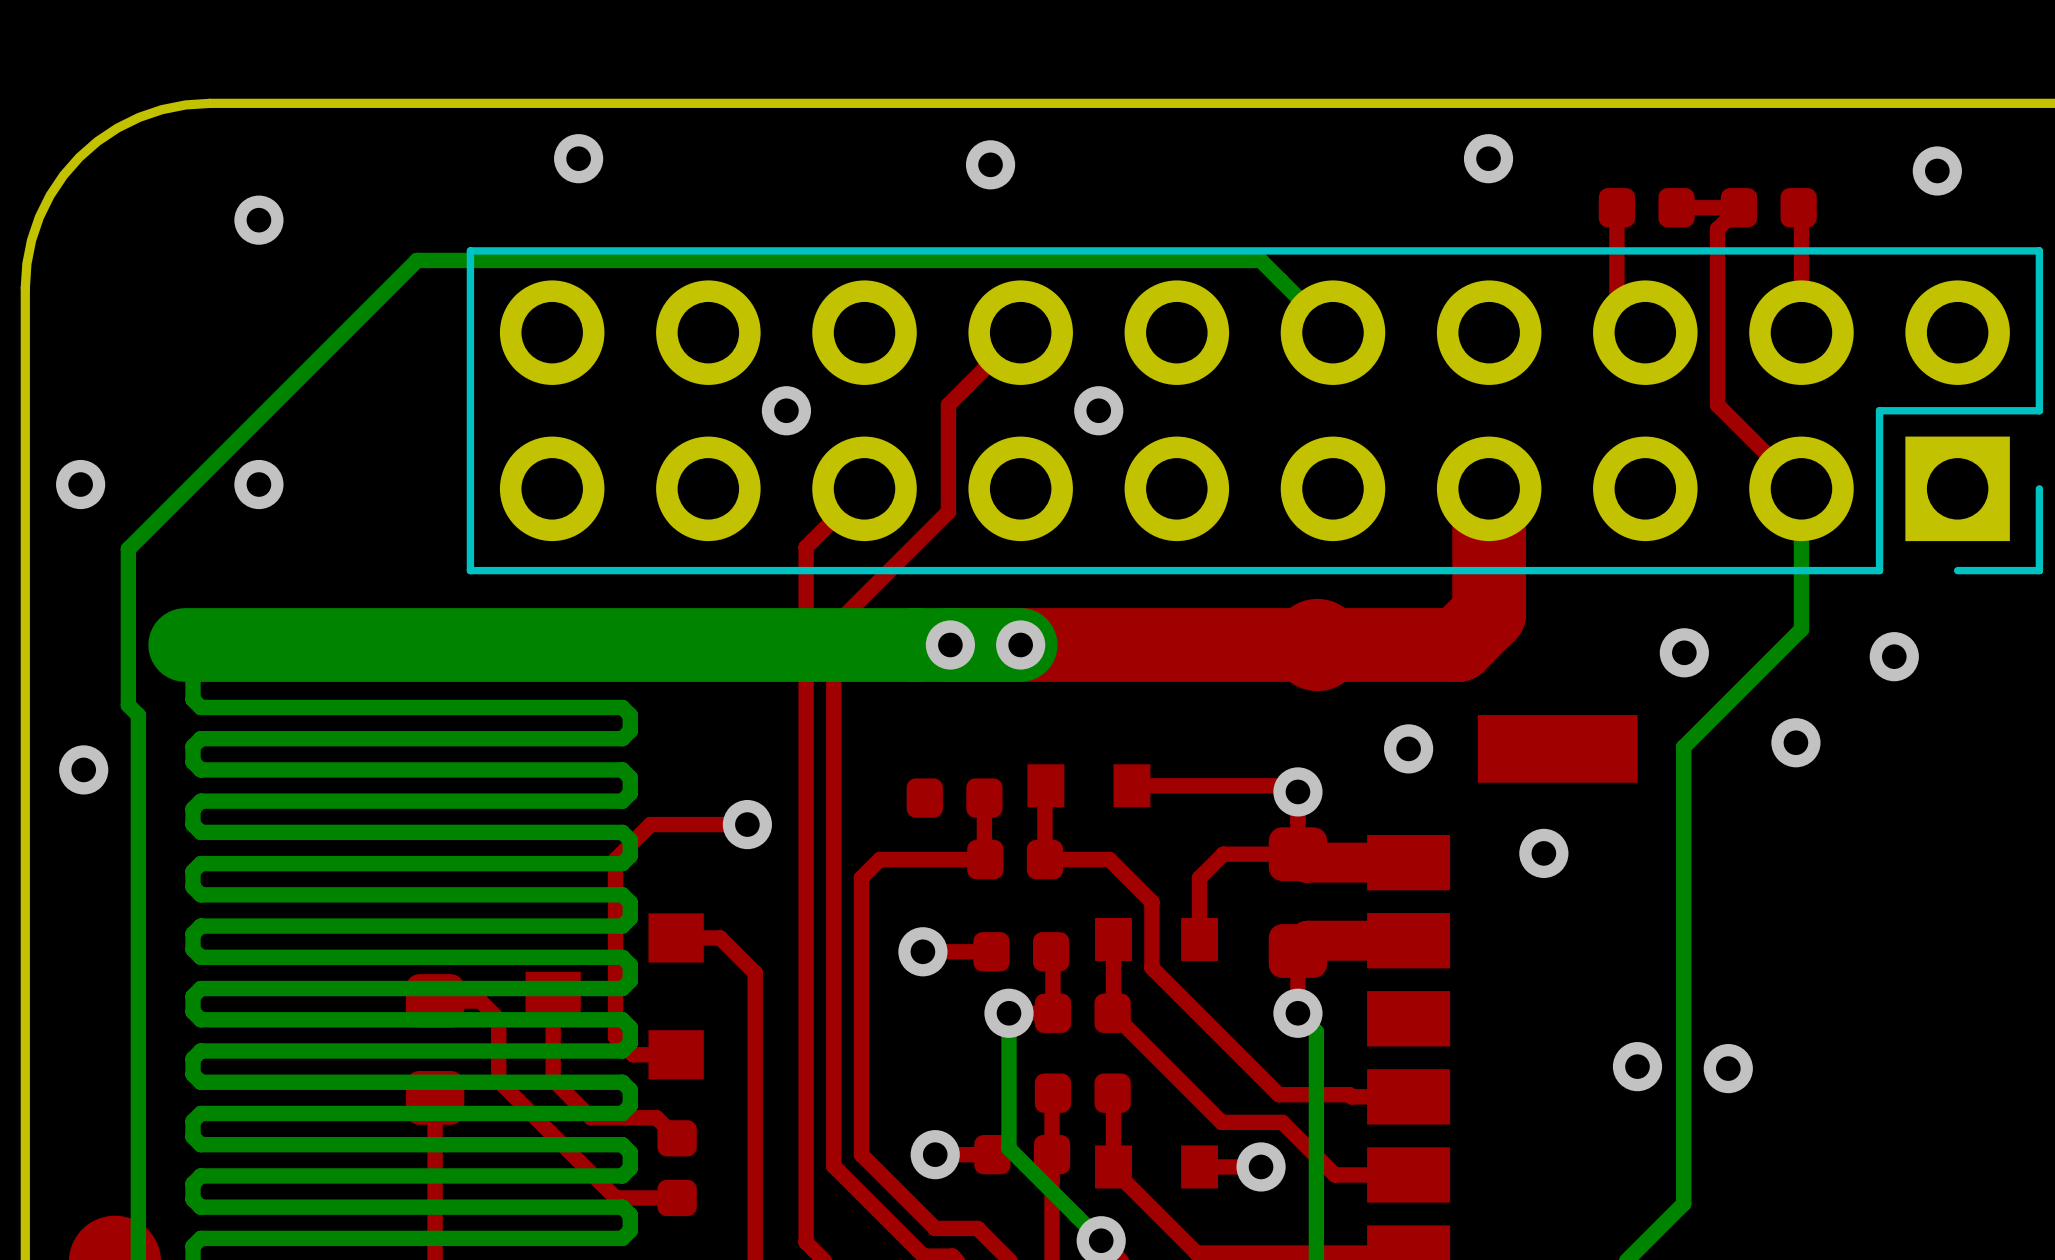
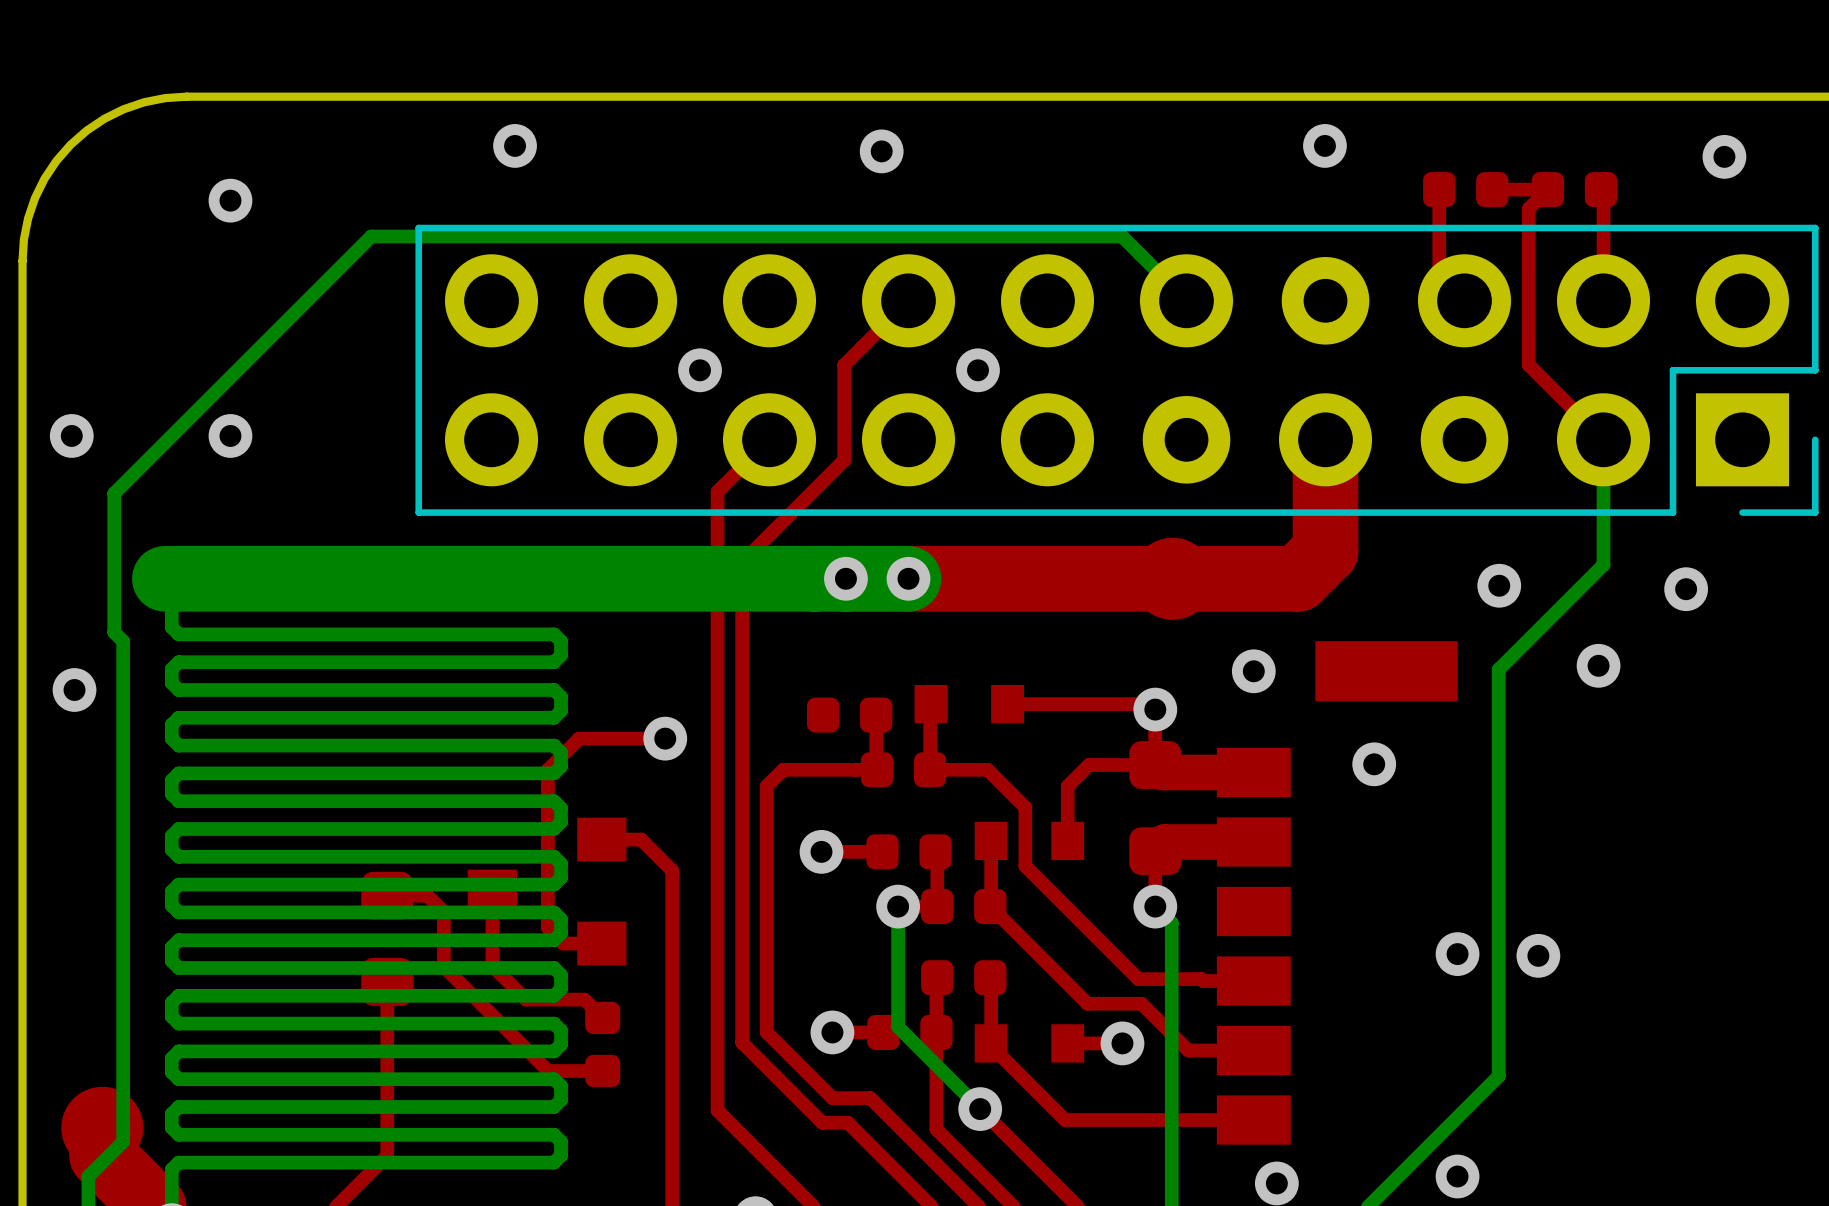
part footprint: [466, 247, 2044, 575] -> [415, 224, 1819, 516]

